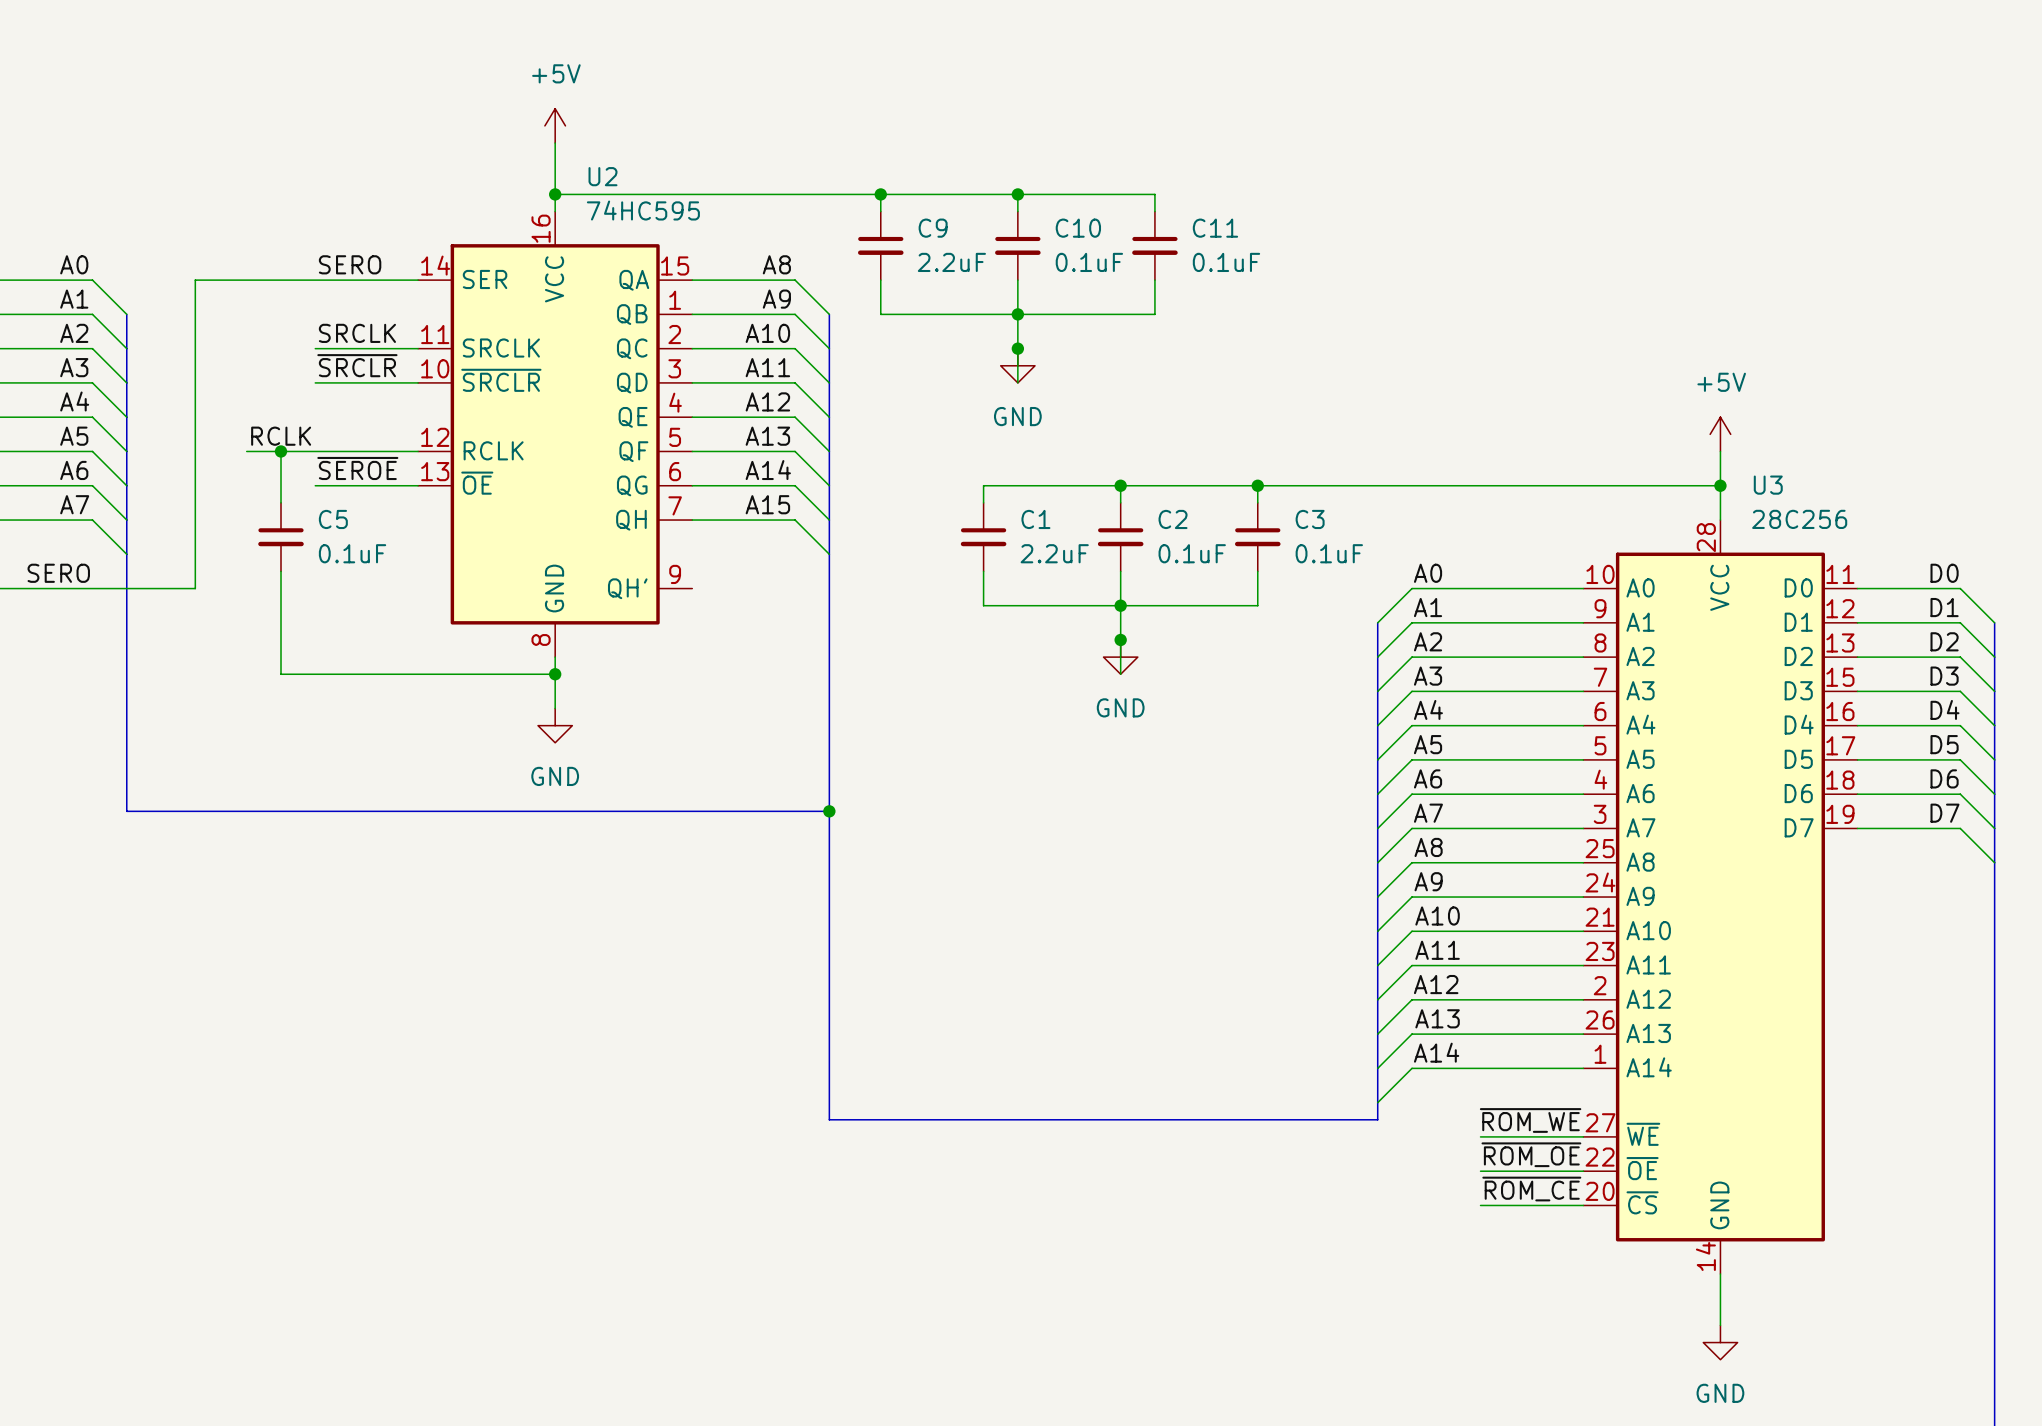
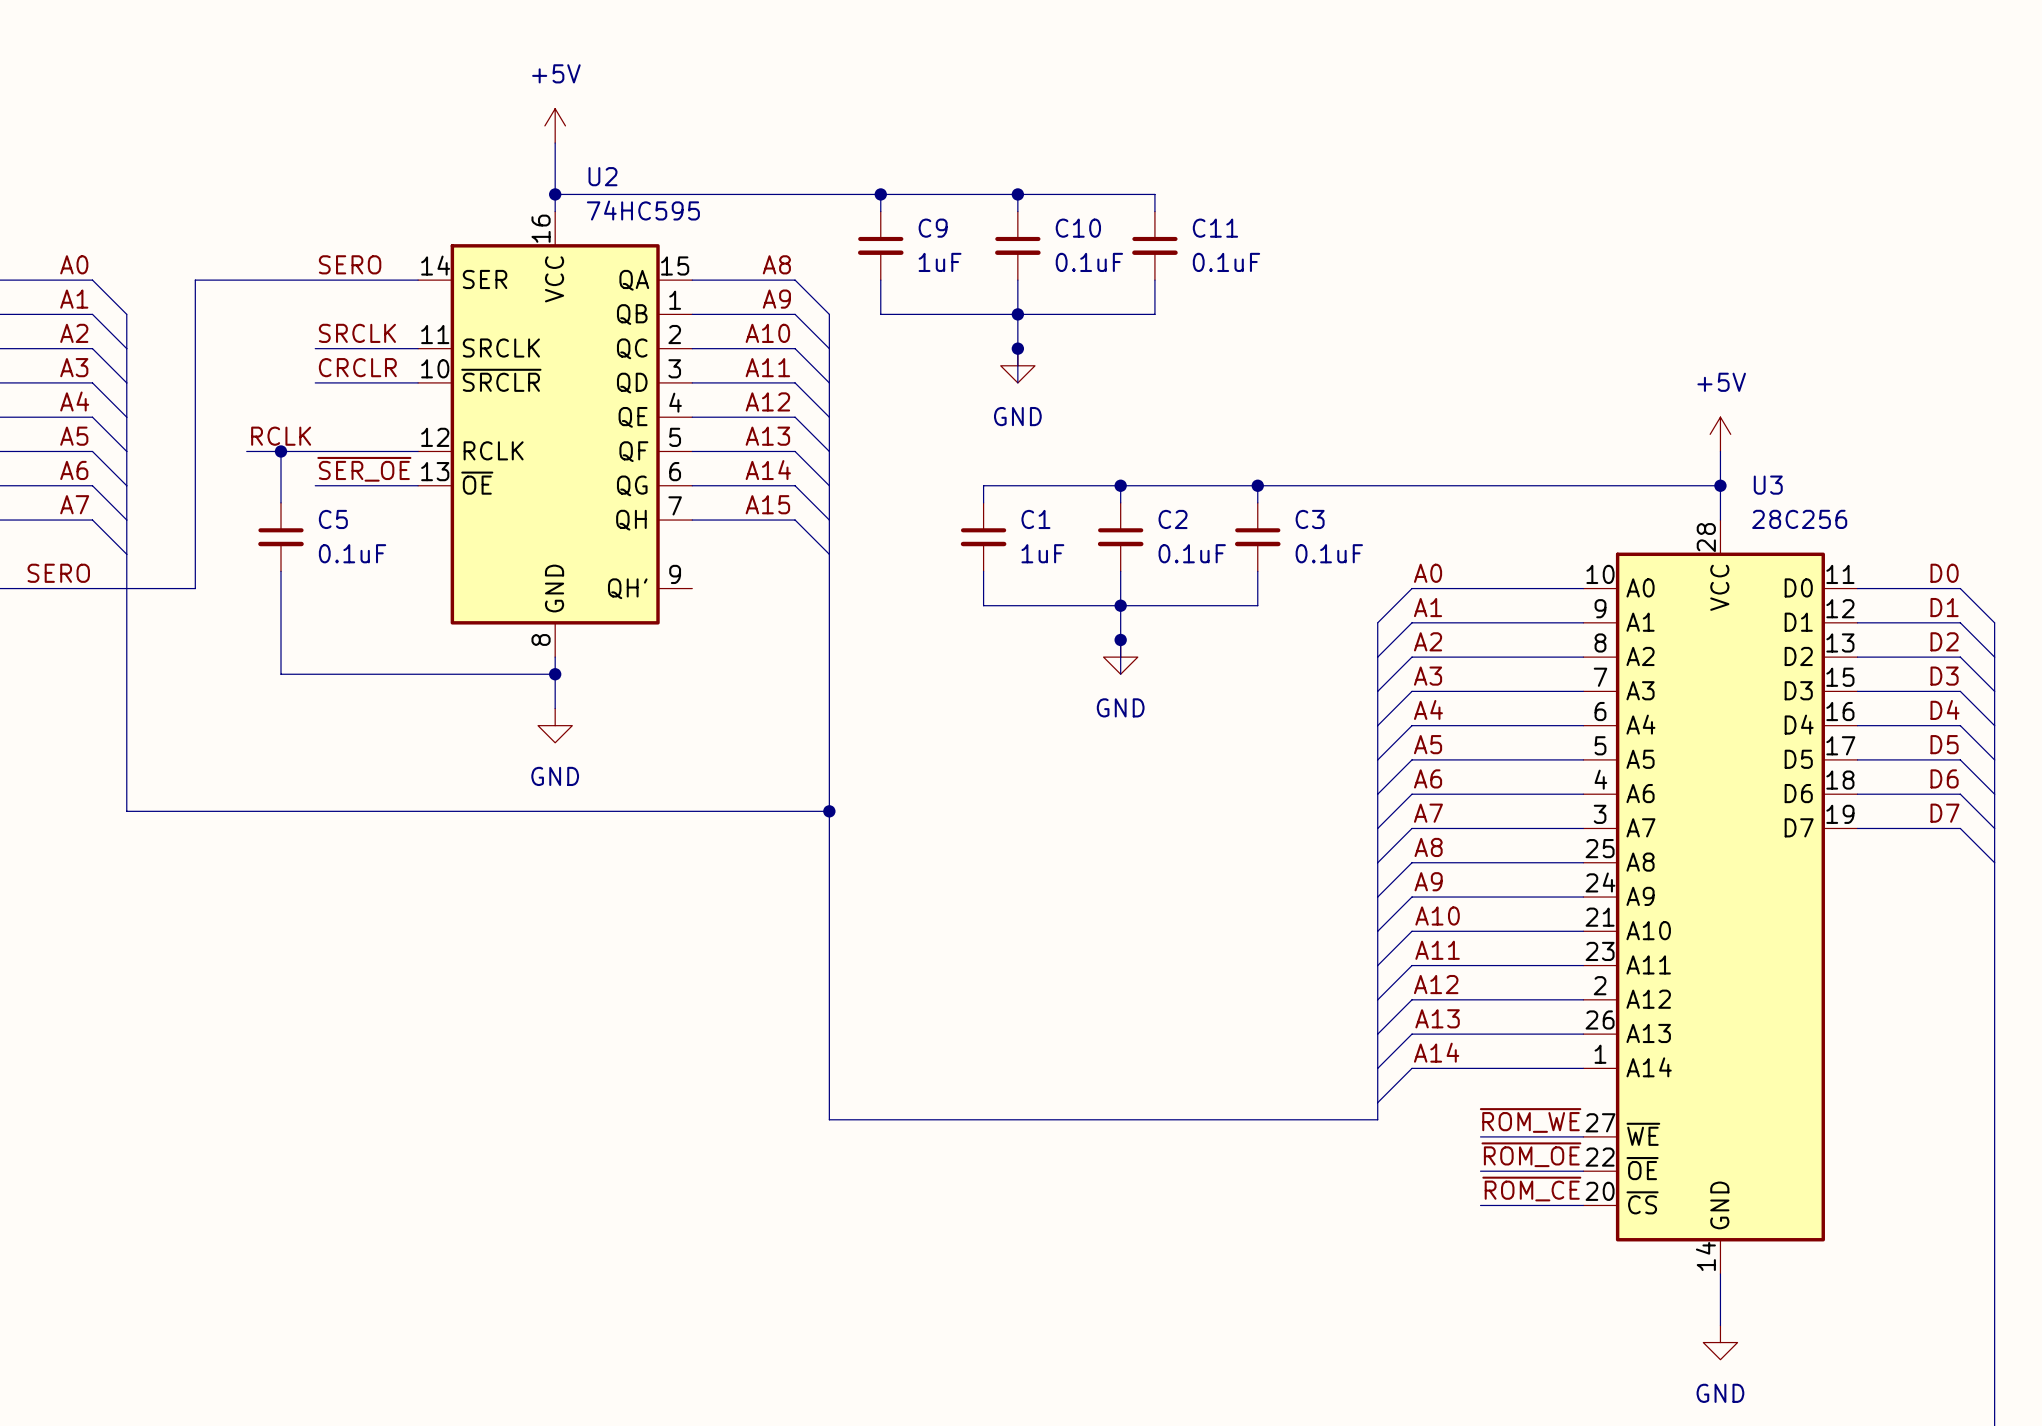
C9 value: 2.2uF (951, 262) -> 1uF (940, 262)
label: ~{SRCLR} (357, 365) -> CRCLR (357, 367)
label: ~{SEROE} (357, 468) -> ~{SER_OE} (364, 469)
C1 value: 2.2uF (1054, 553) -> 1uF (1042, 553)

